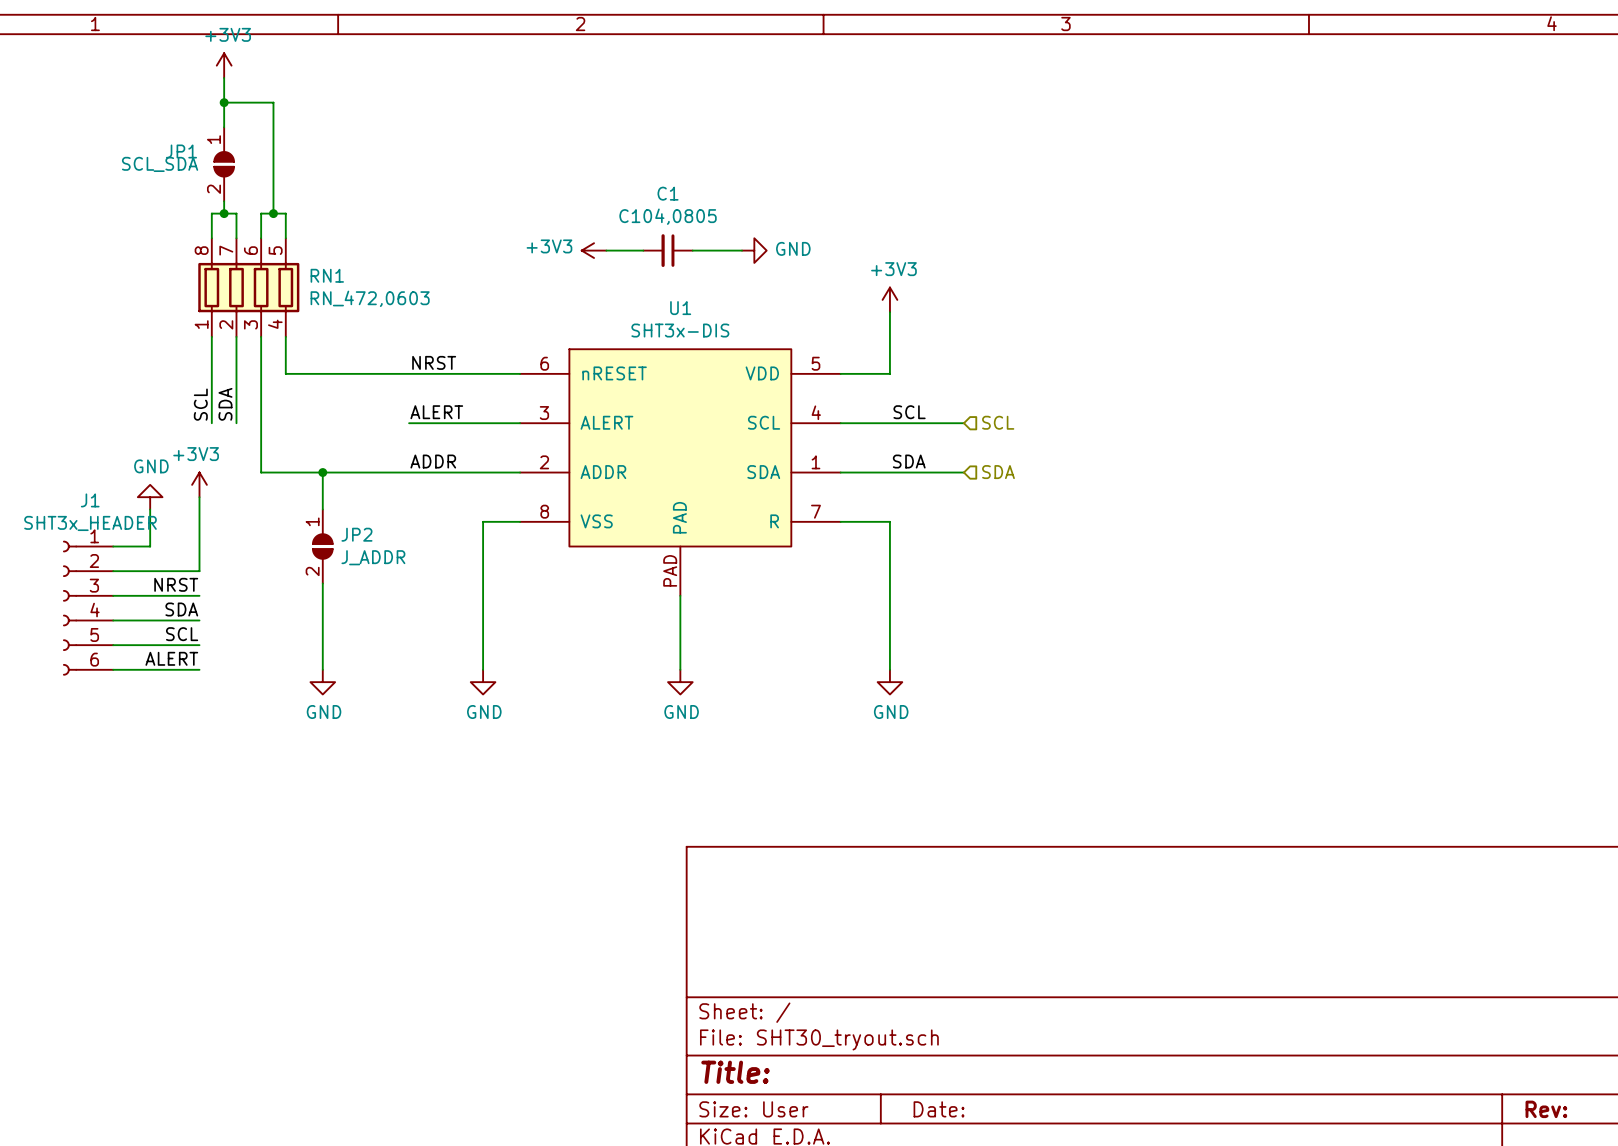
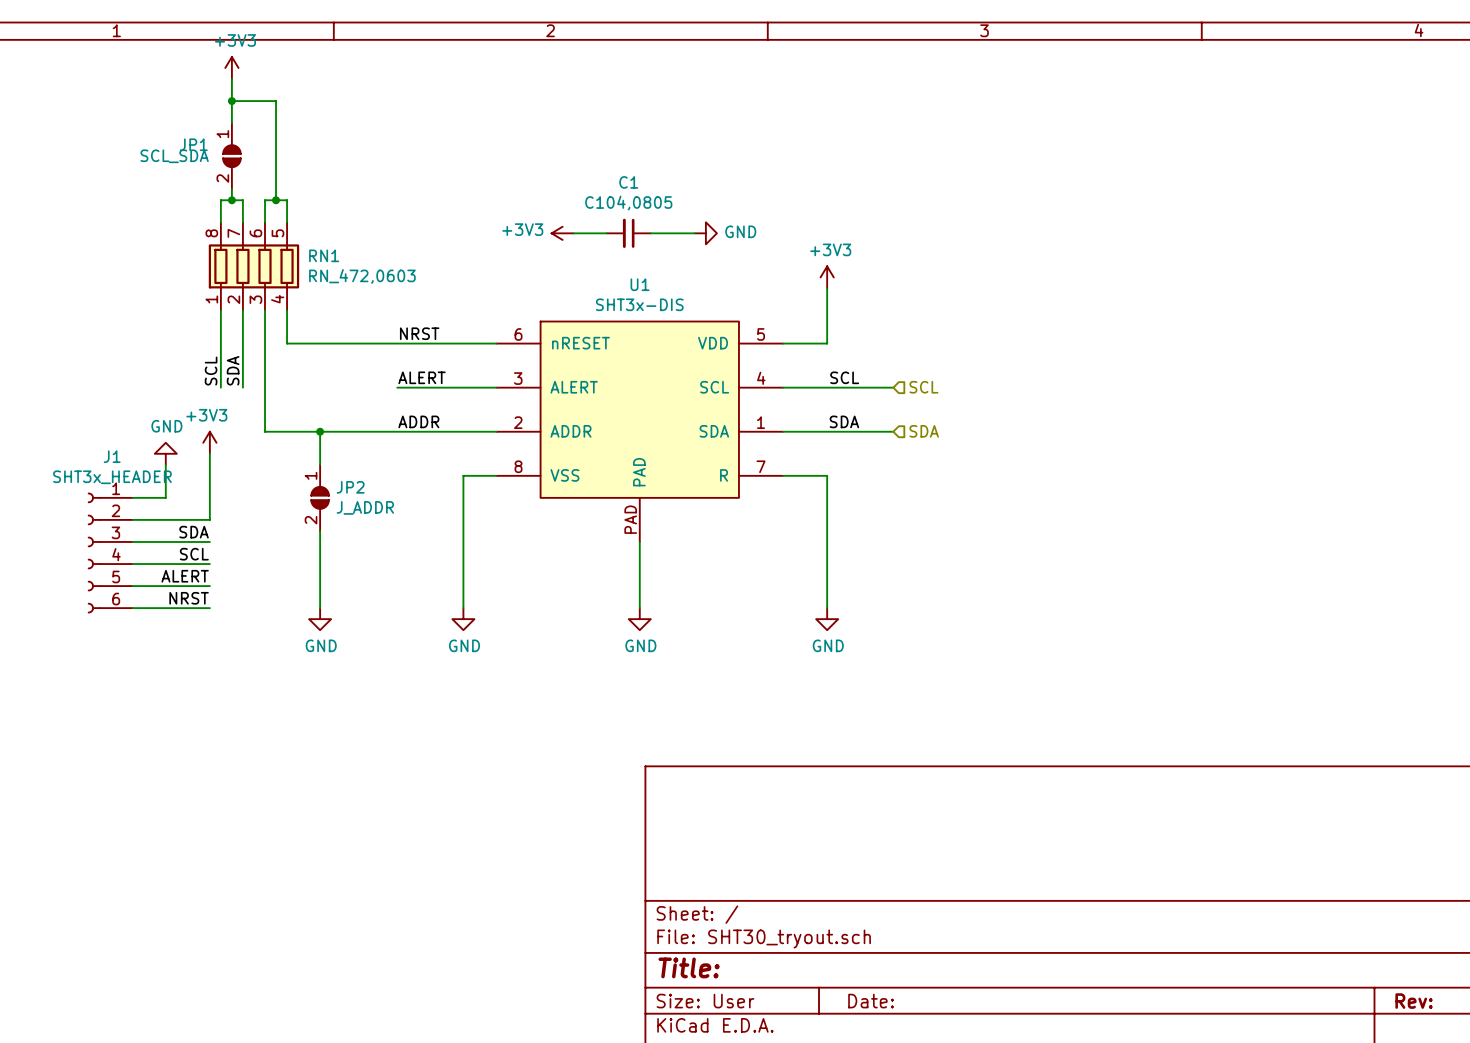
label: NRST (176, 584) -> SDA (194, 532)
label: SDA (181, 609) -> SCL (194, 554)
label: SCL (182, 634) -> ALERT (185, 576)
label: ALERT (171, 658) -> NRST (189, 598)

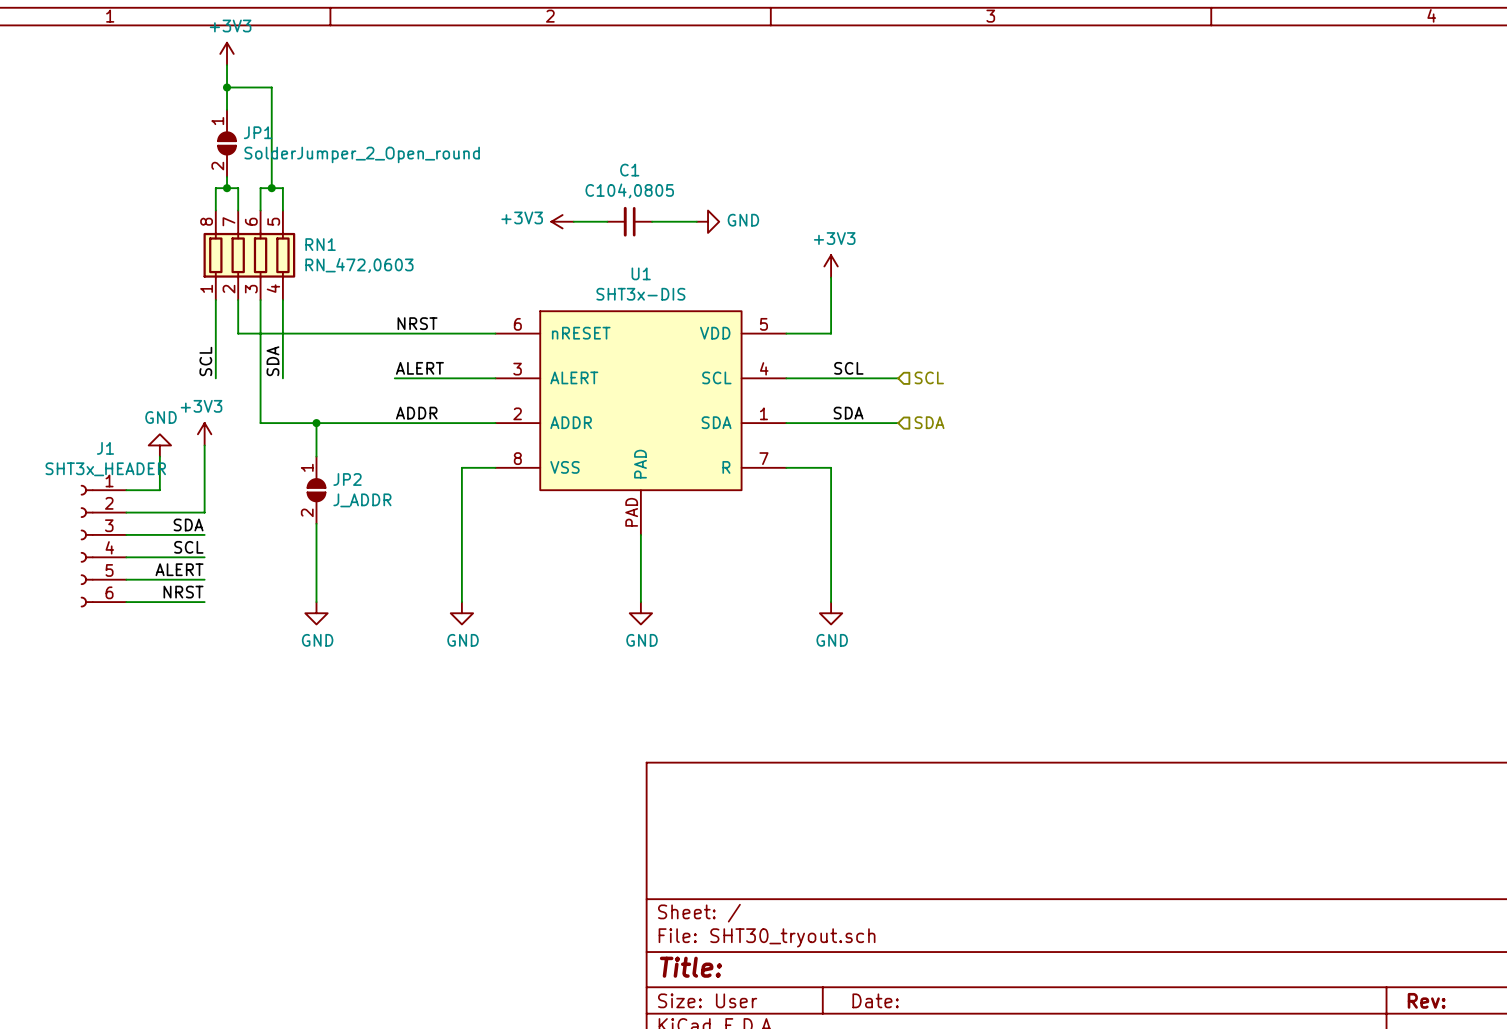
JP1 name position: JP1 (193, 144) -> JP1 (258, 132)
JP1 value: SCL_SDA (174, 156) -> SolderJumper_2_Open_round (362, 154)
wire: (242, 343) (242, 387) -> (238, 333) (282, 333) (282, 378)
label position: SDA (233, 370) -> SDA (272, 361)

